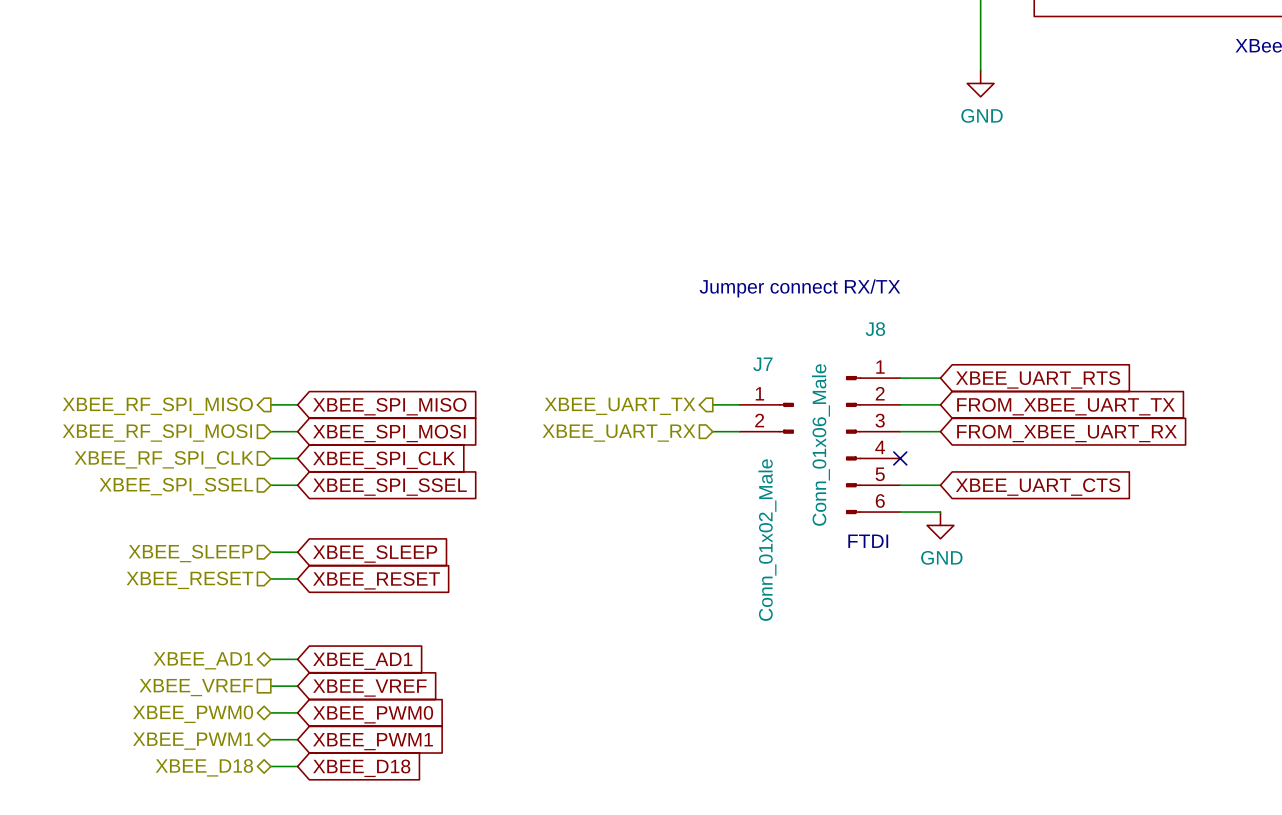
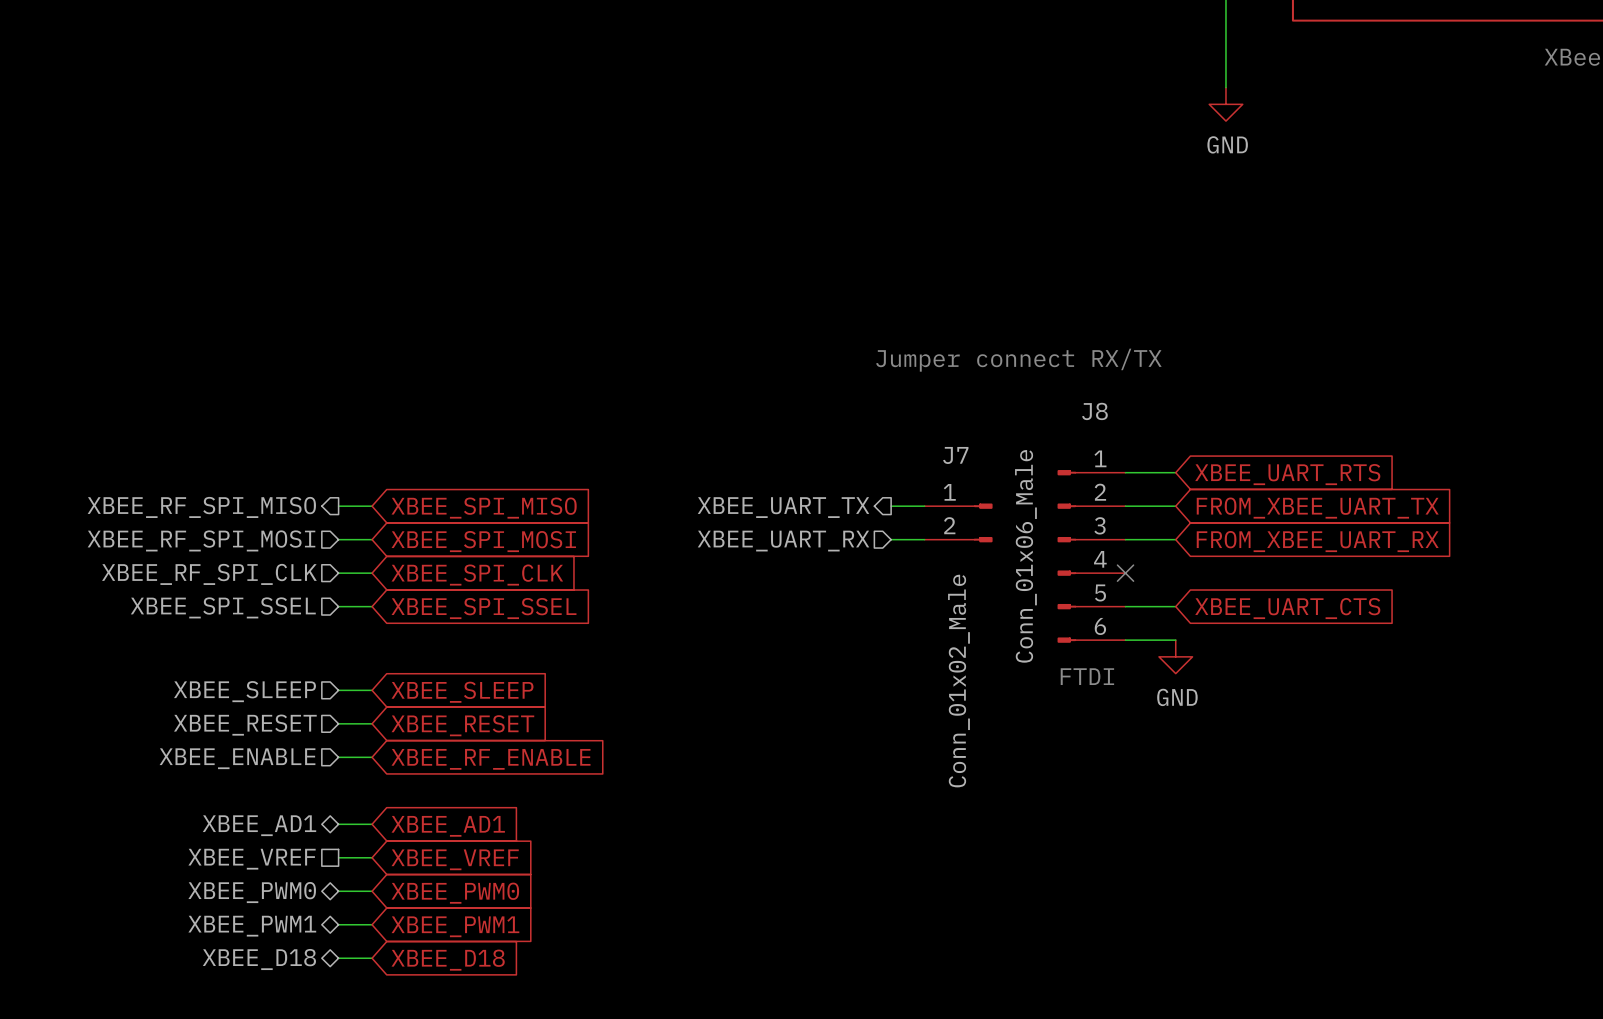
wire: none -> (338, 757) (372, 757)
hierarchical label: none -> XBEE_ENABLE (237, 758)
global label: none -> XBEE_RF_ENABLE (491, 759)

